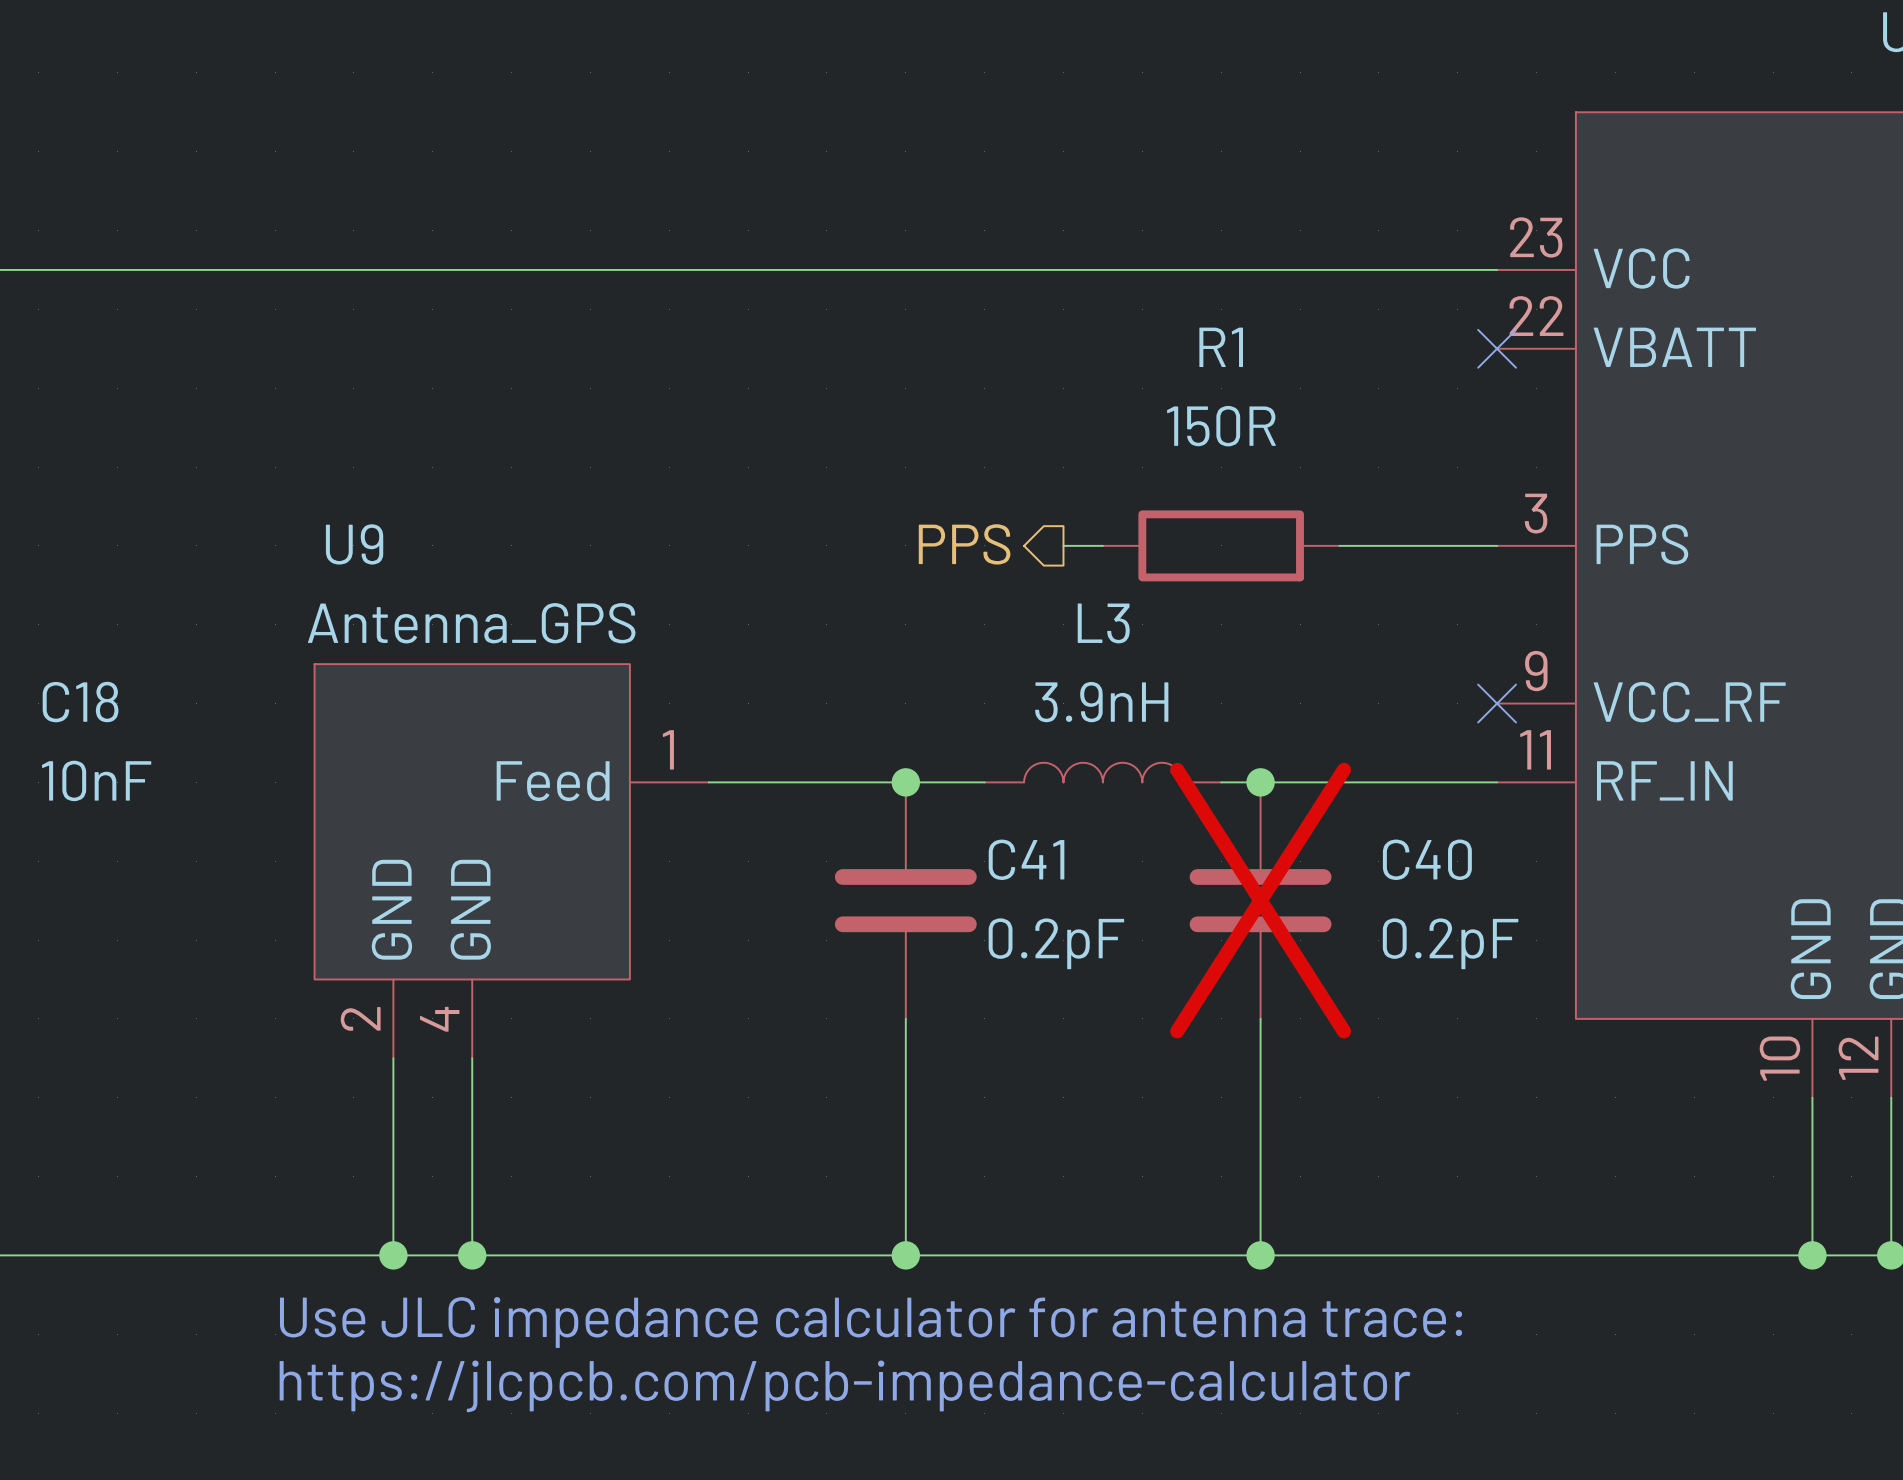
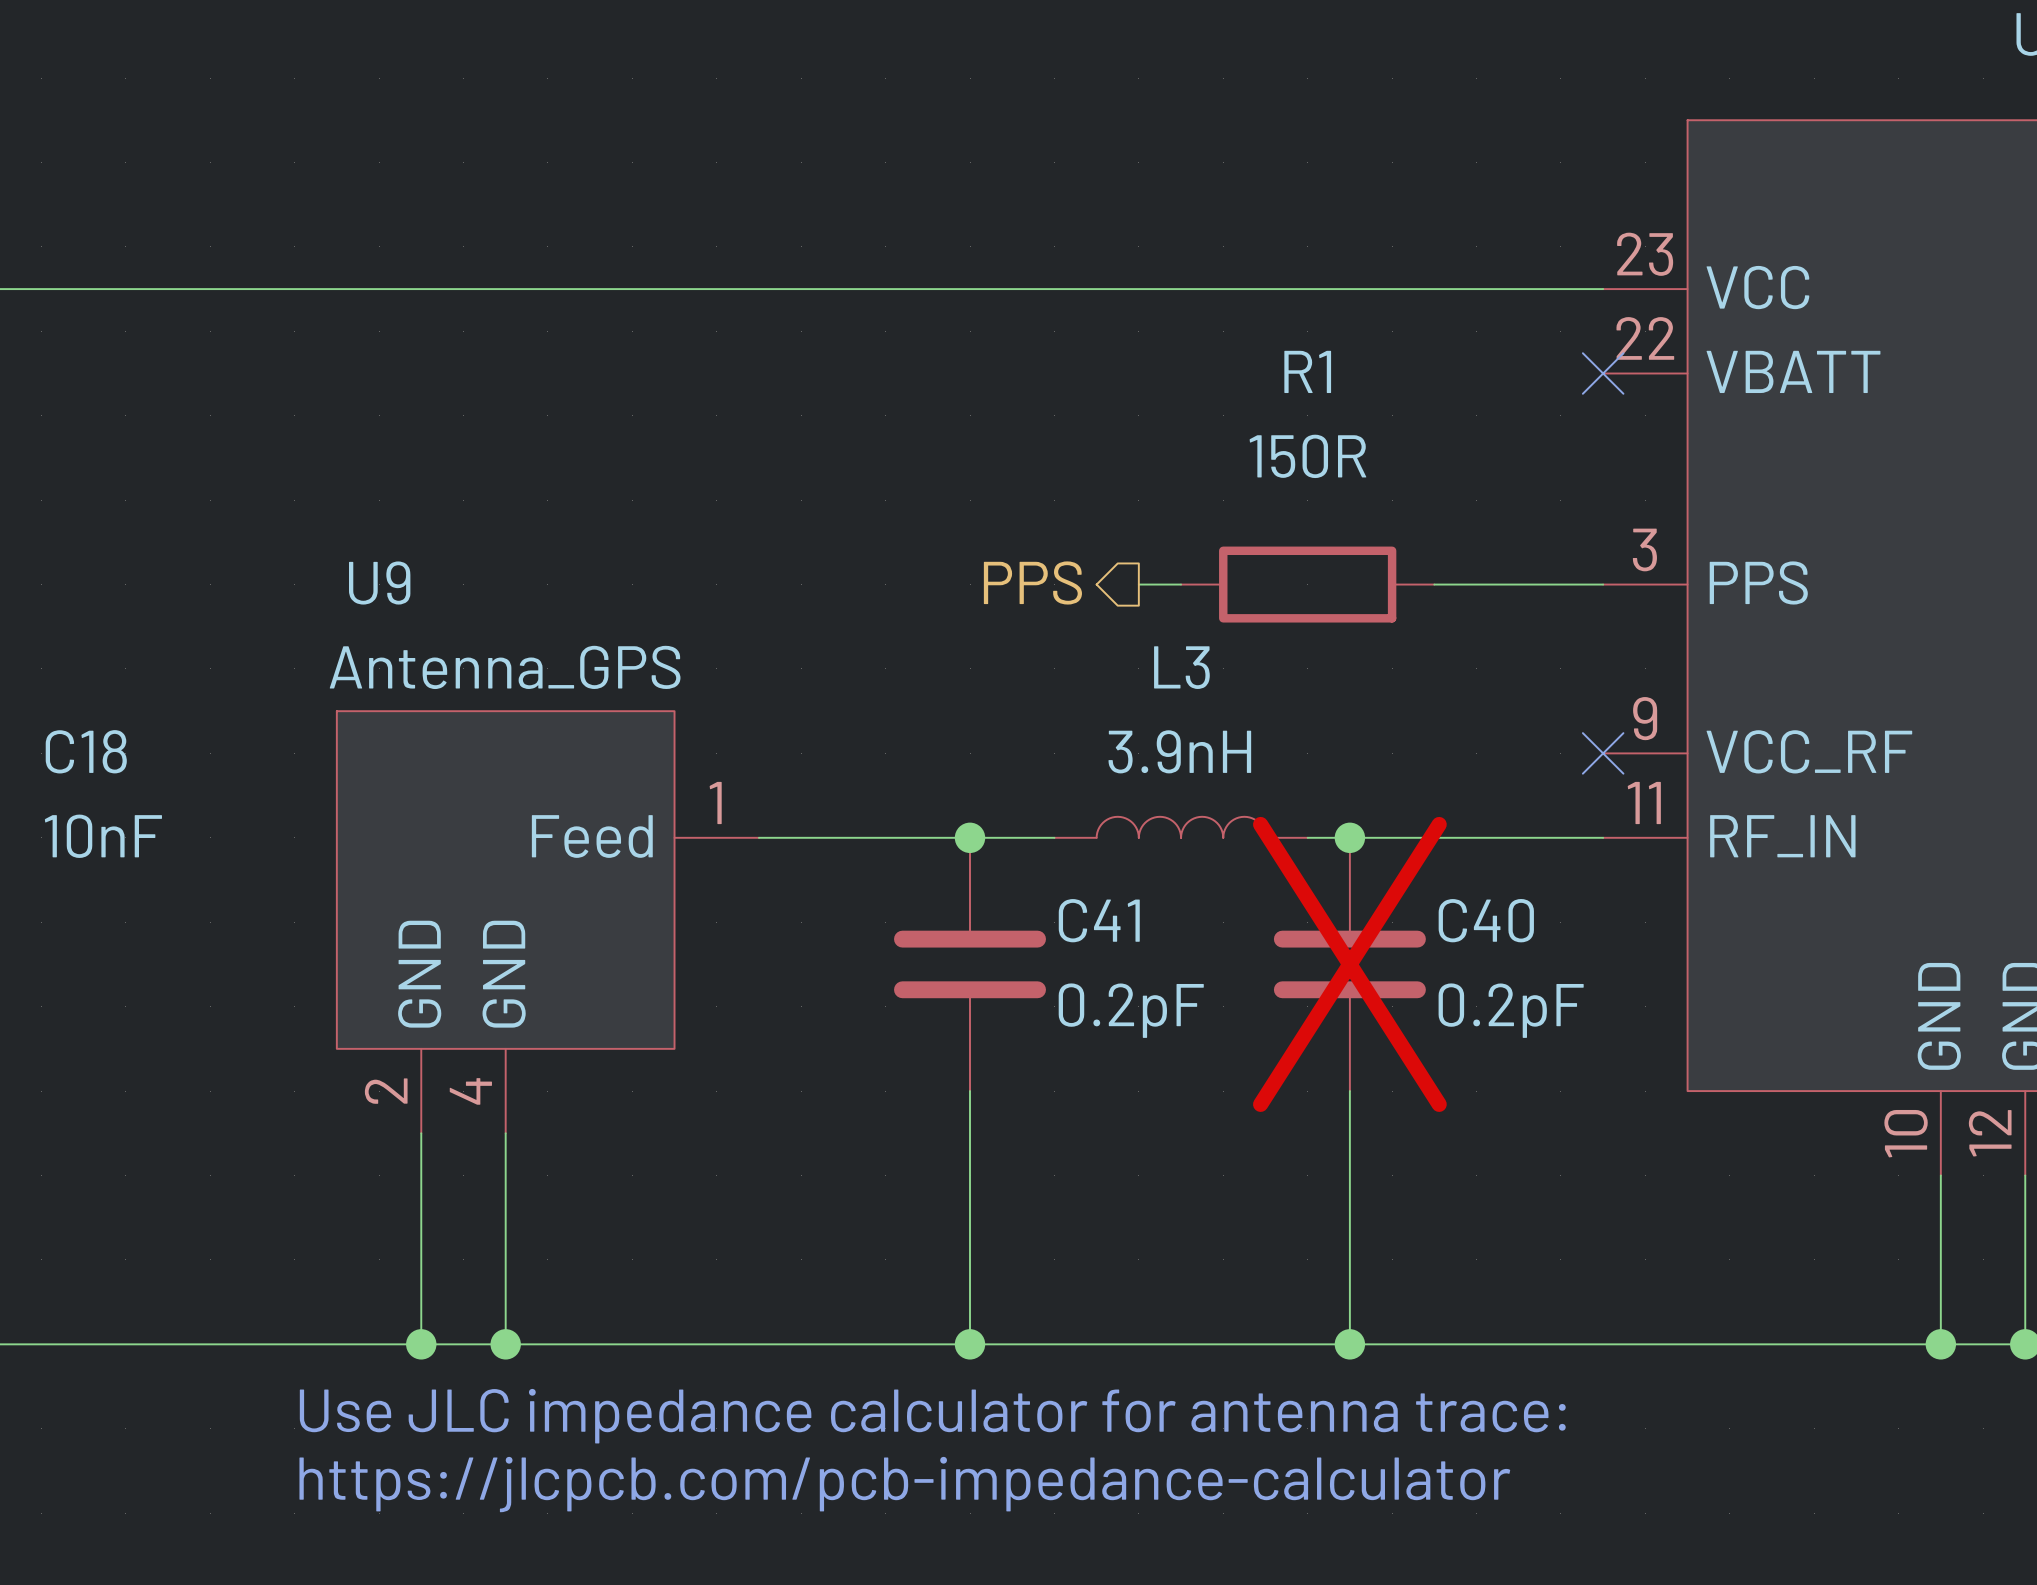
C40 name position: C40 (1427, 859) -> C40 (1486, 920)
C40 value position: 0.2pF (1450, 943) -> 0.2pF (1511, 1010)

